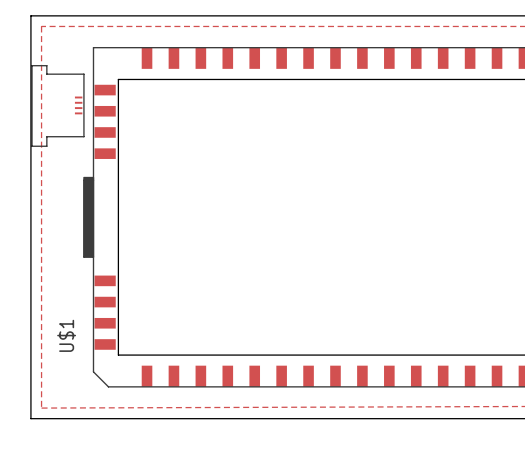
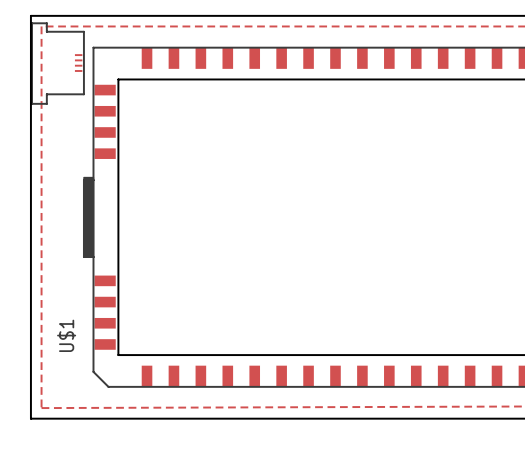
part position: (57, 105) -> (57, 63)

